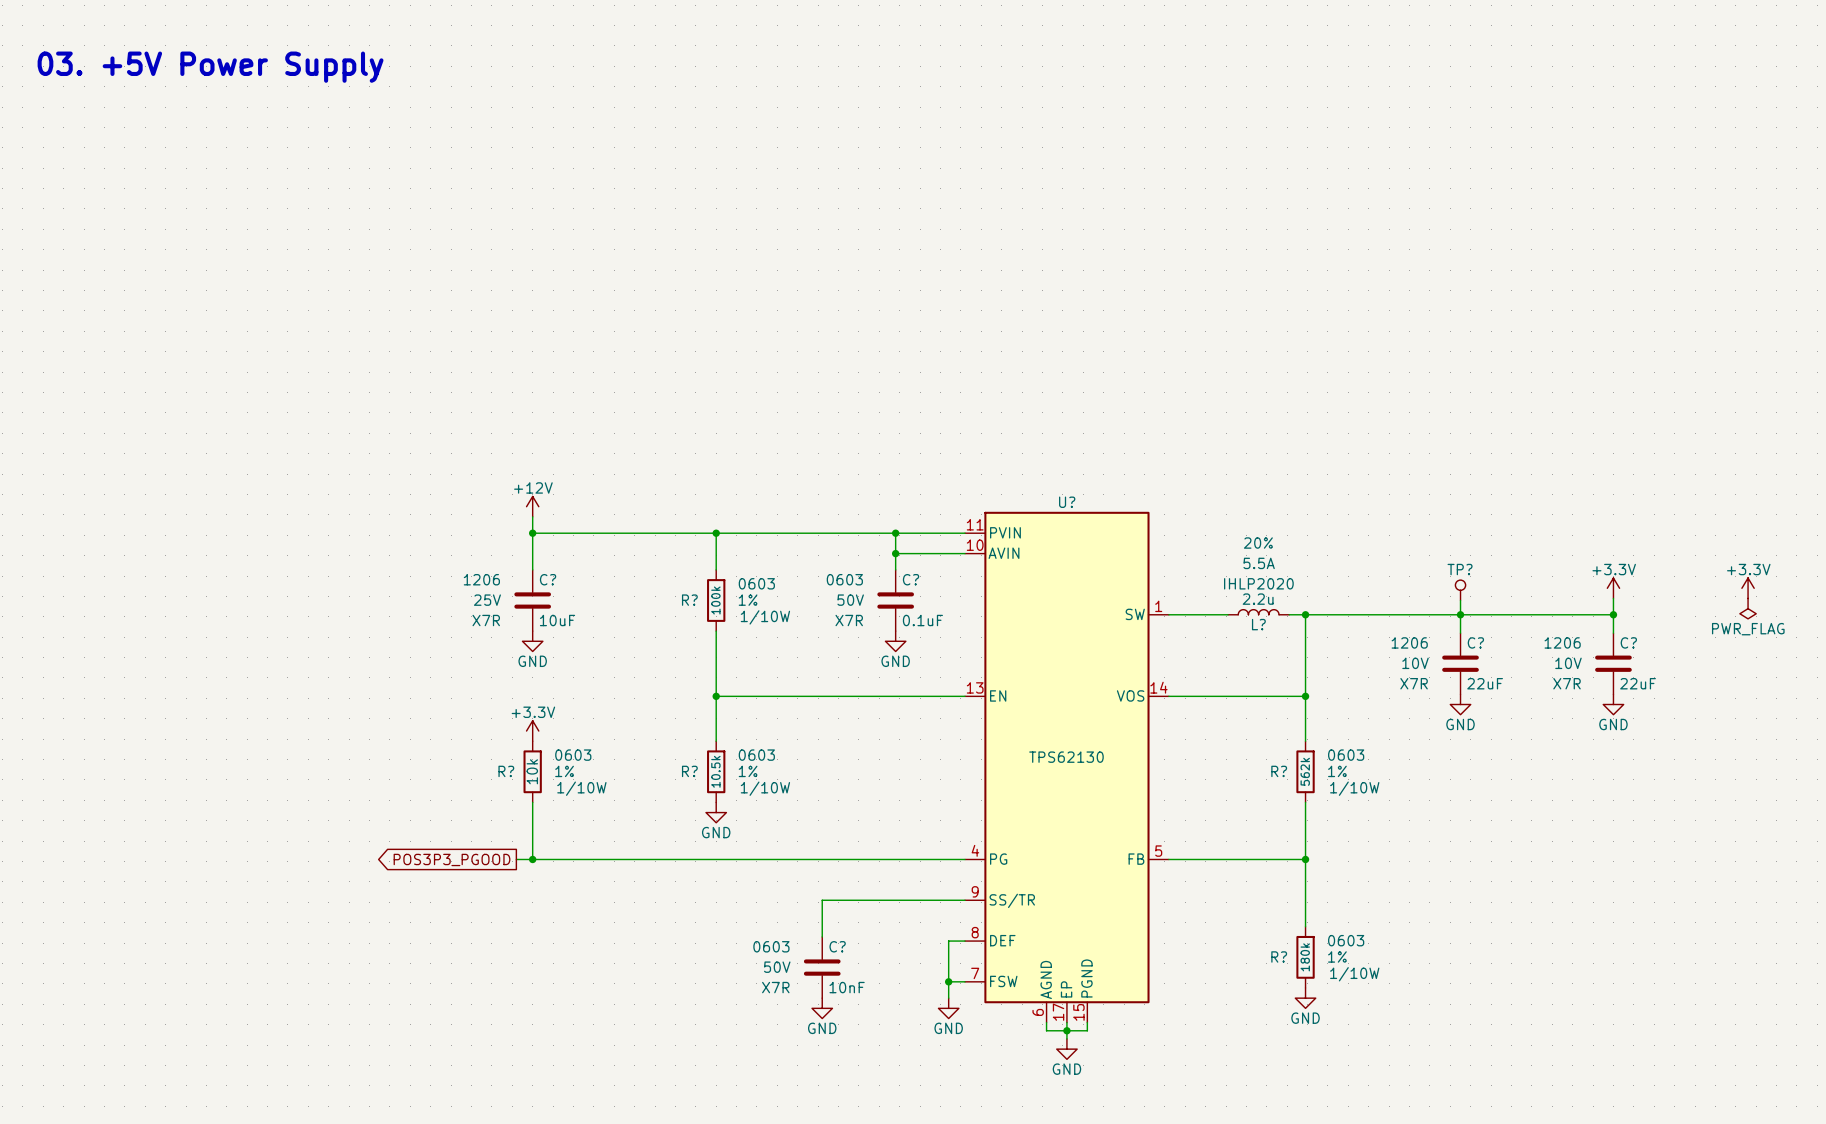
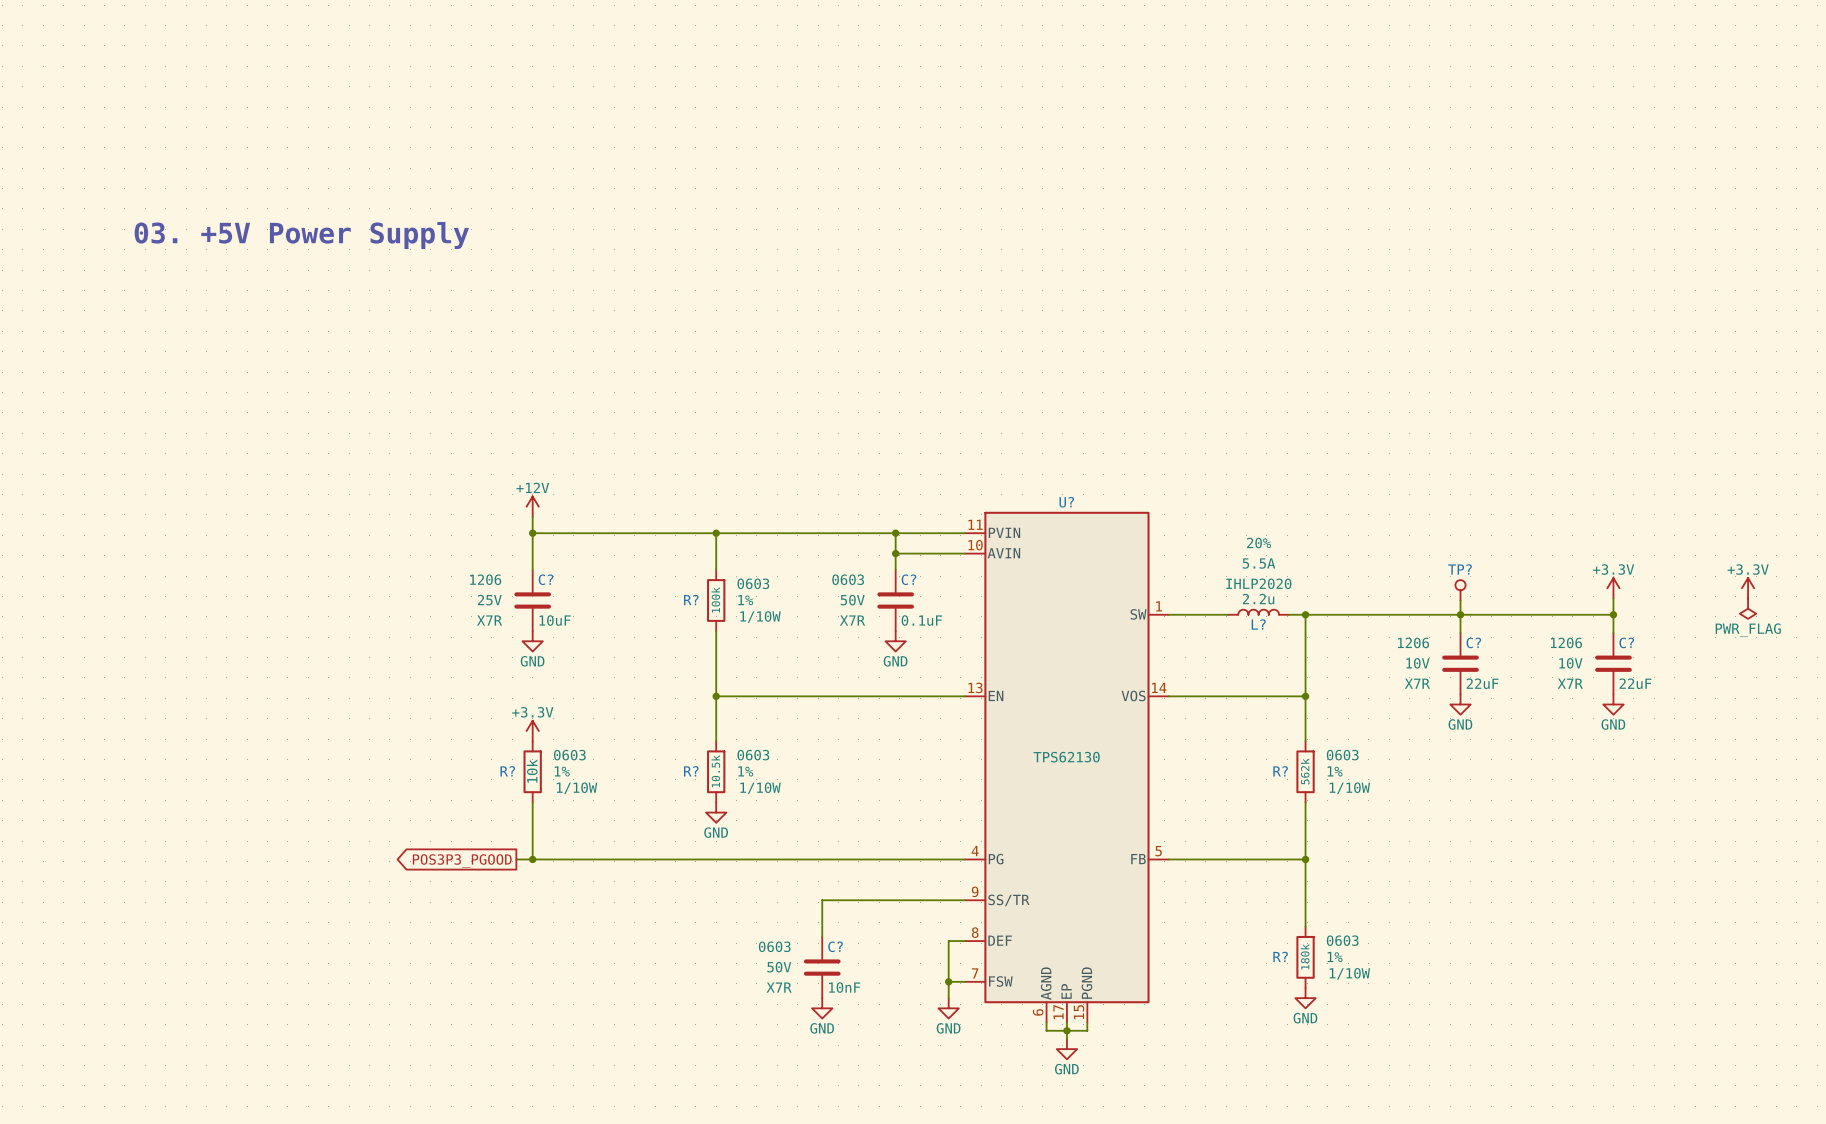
text position: 03. +5V Power Supply (210, 67) -> 03. +5V Power Supply (301, 235)

